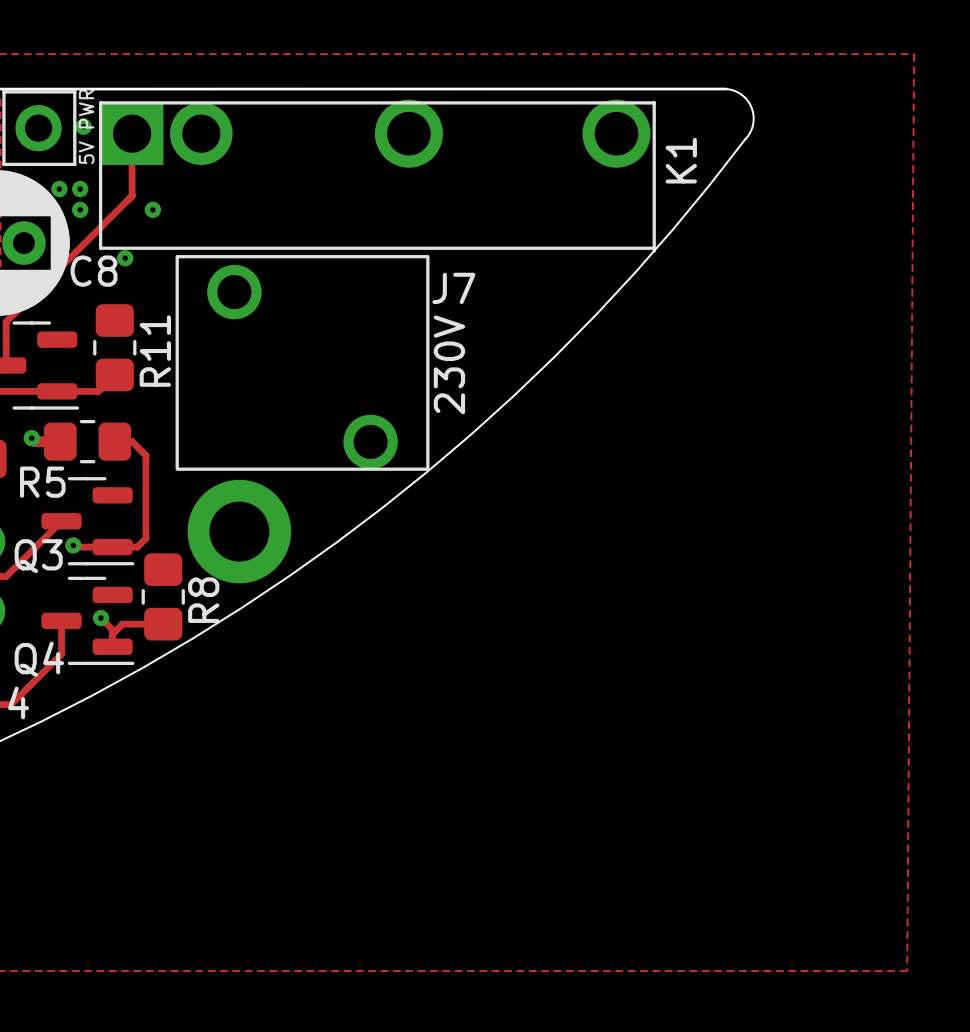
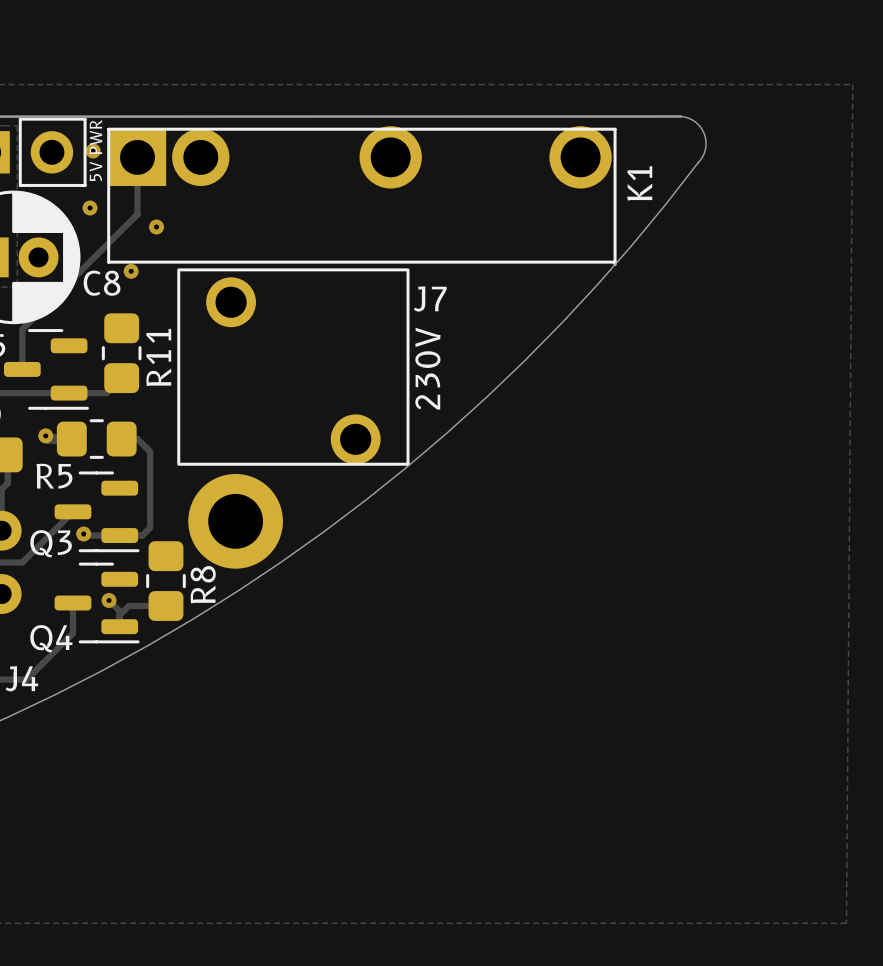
via: (59, 189) -> none
via: (80, 209) -> none

